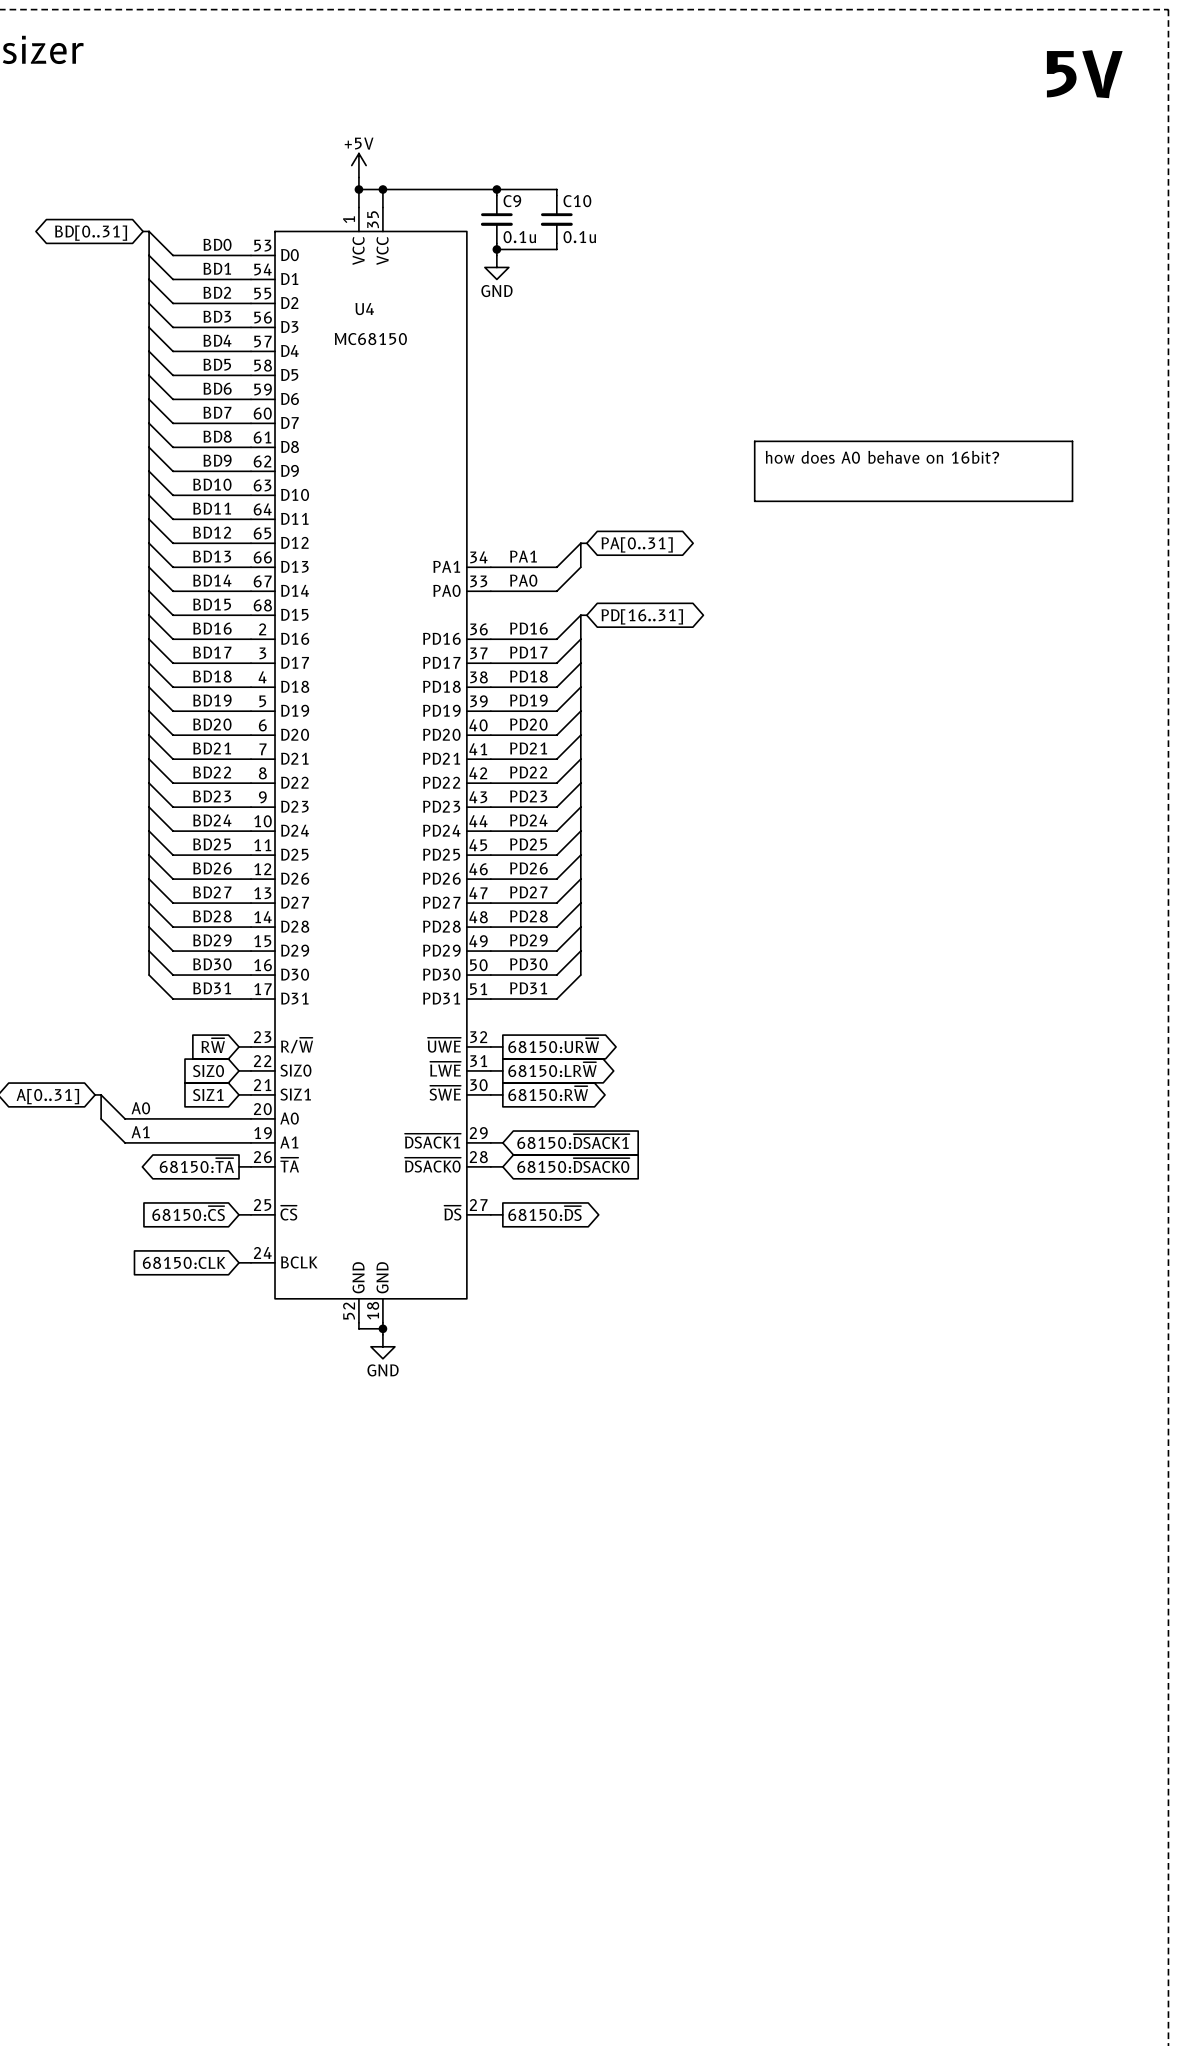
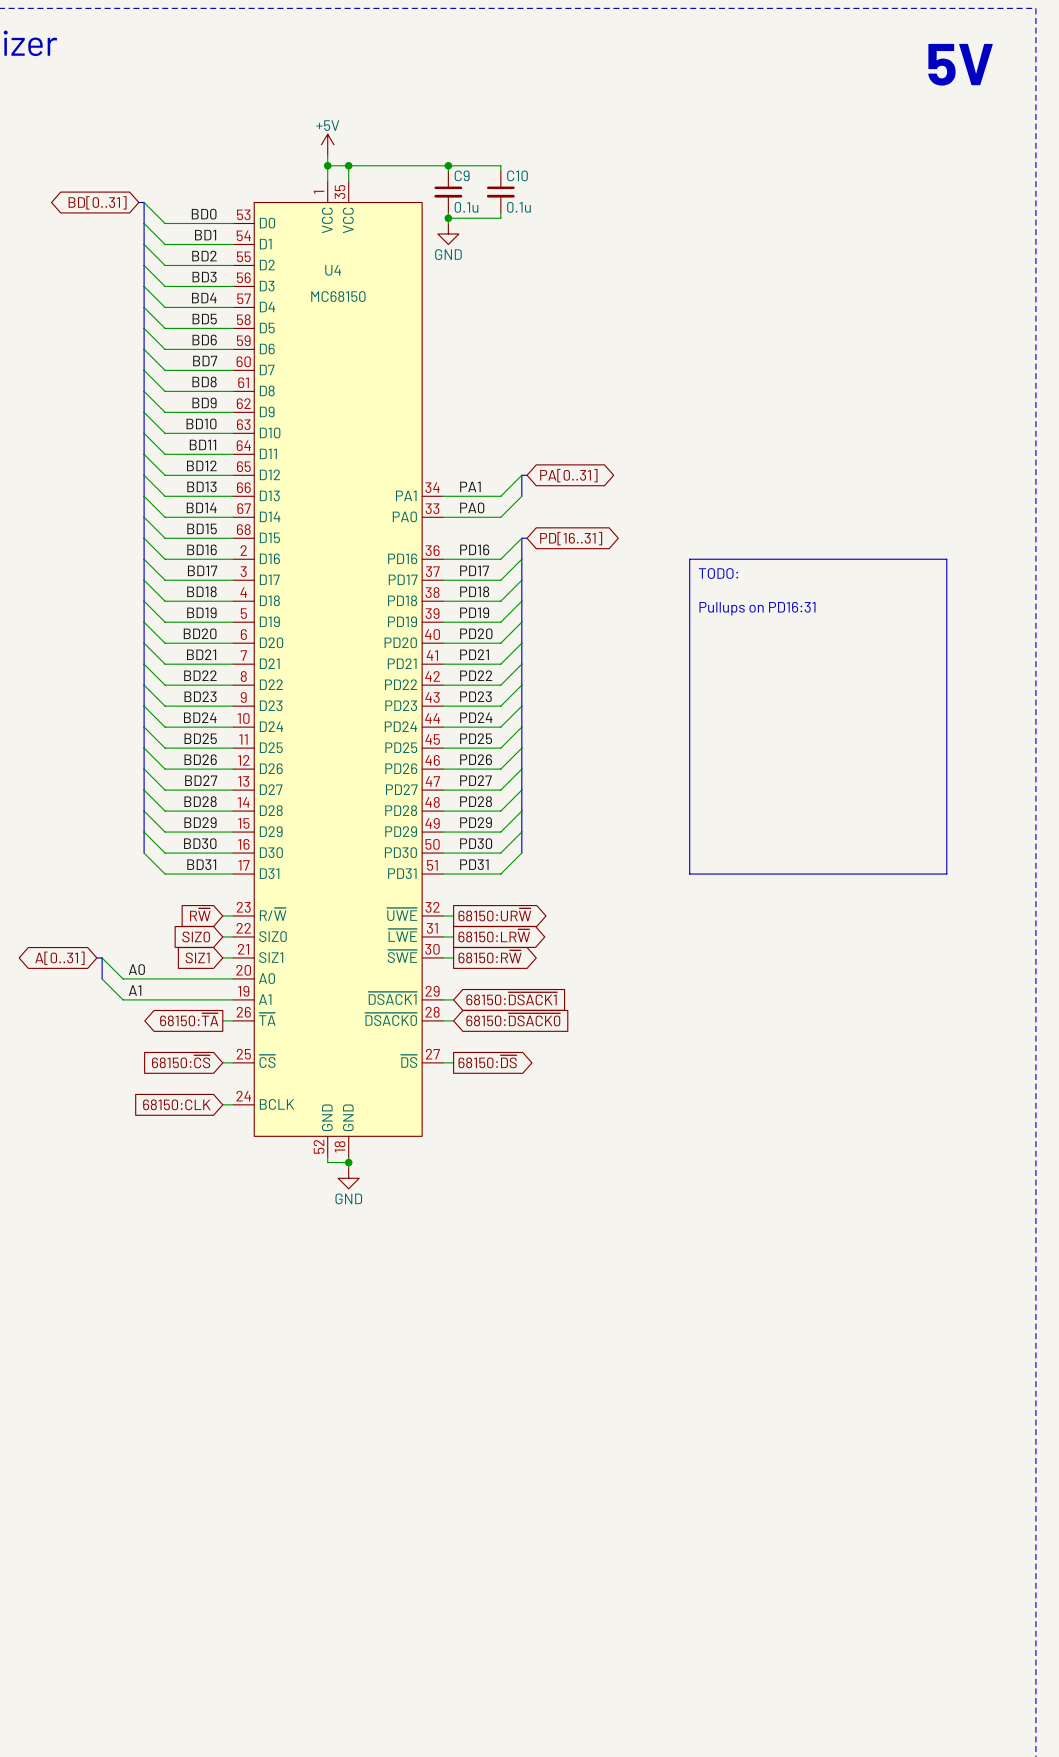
line: (754, 441) (1072, 441) (1072, 501) (754, 501) (754, 441) -> none
text: how does A0 behave on 16bit? (882, 457) -> none
line: none -> (689, 559) (946, 559) (946, 874) (689, 874) (689, 559)
text: none -> TODO: (718, 573)
text: none -> Pullups on PD16:31 (757, 608)

